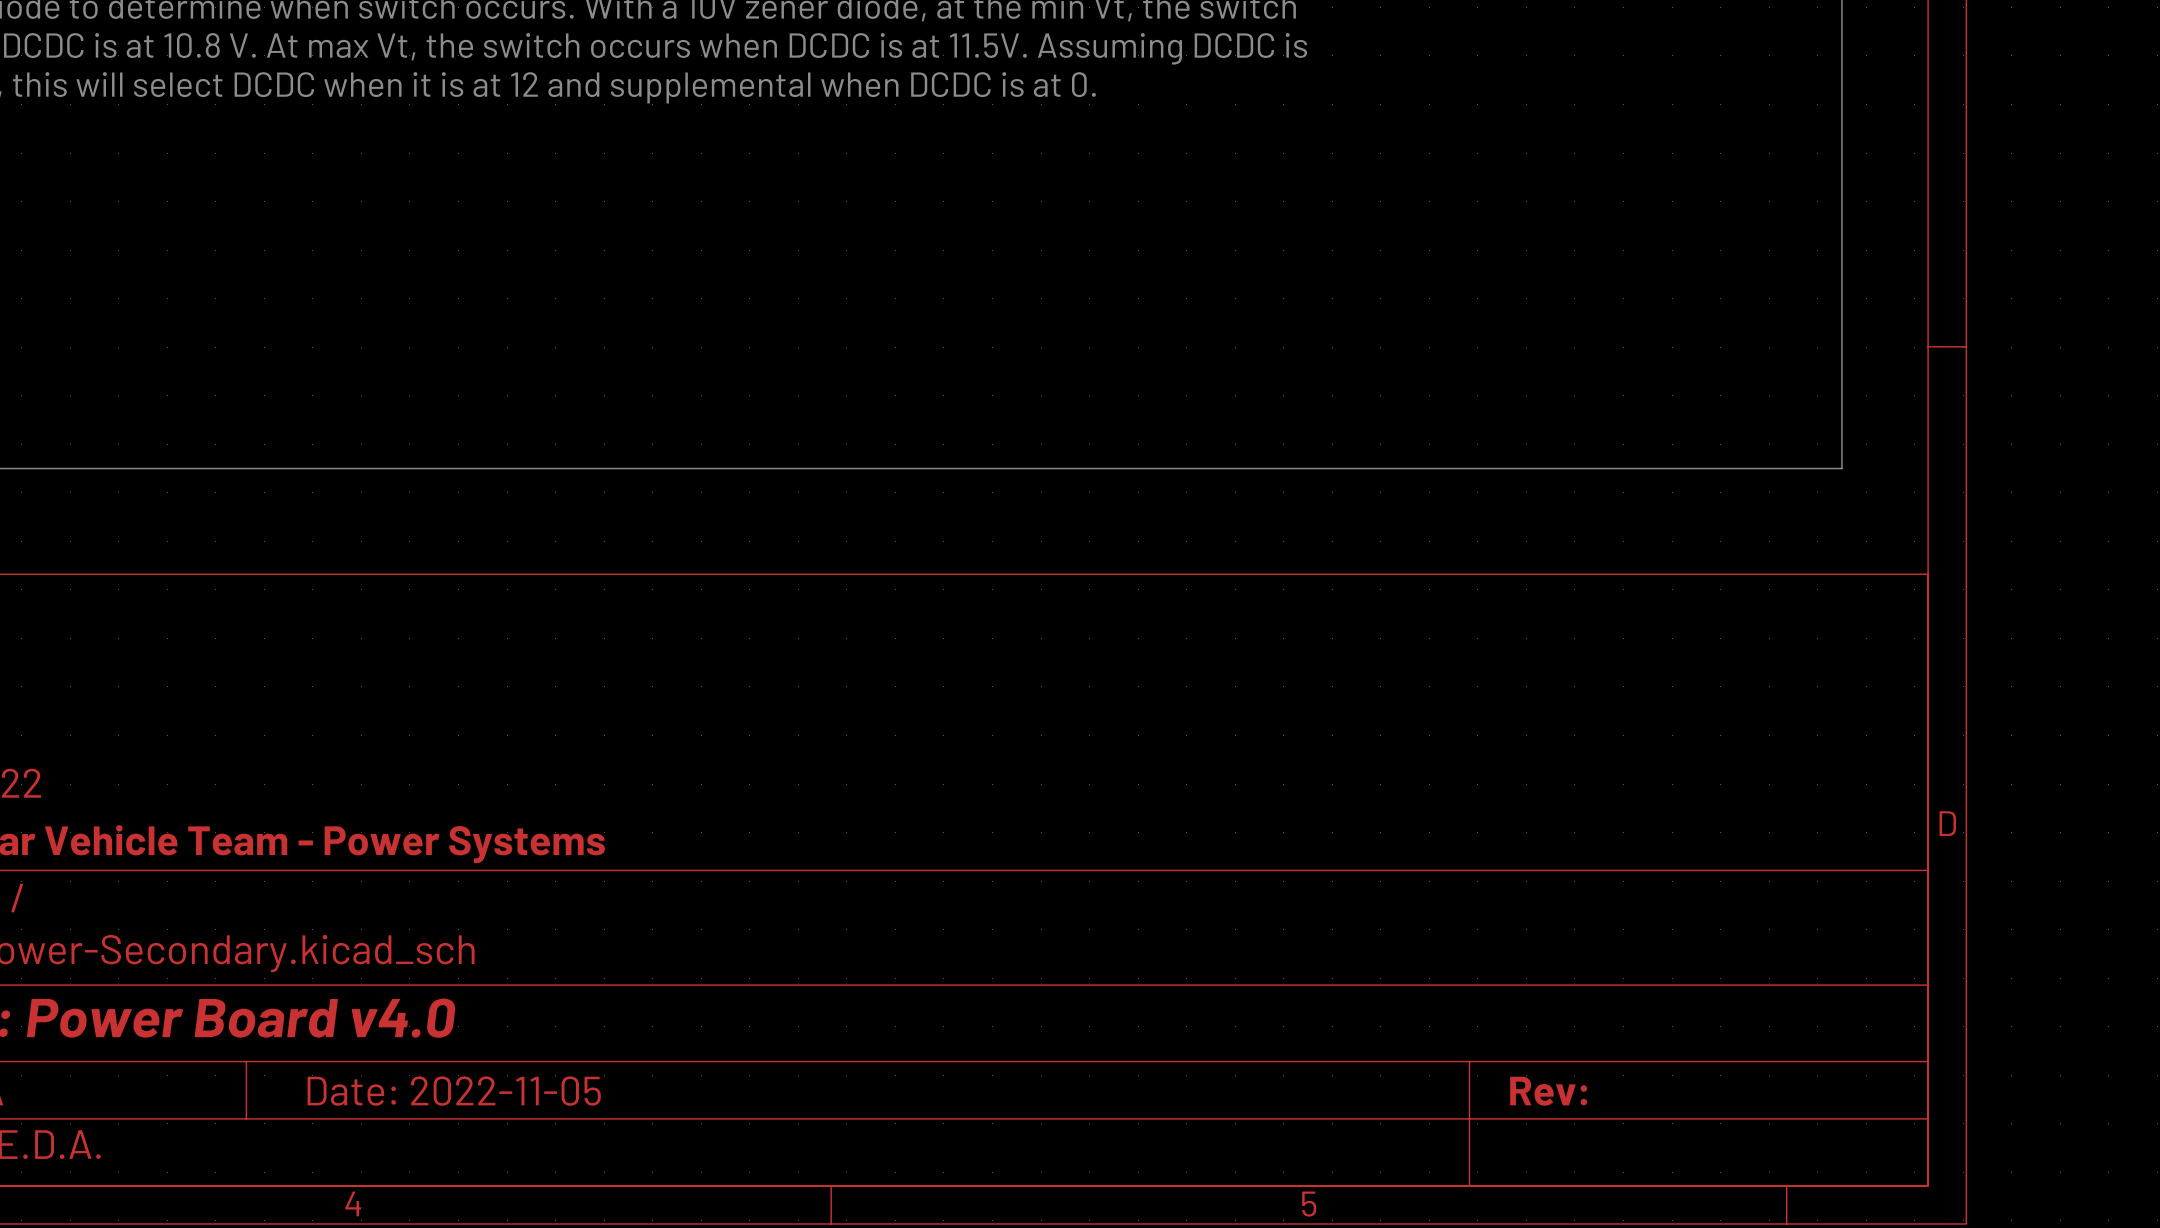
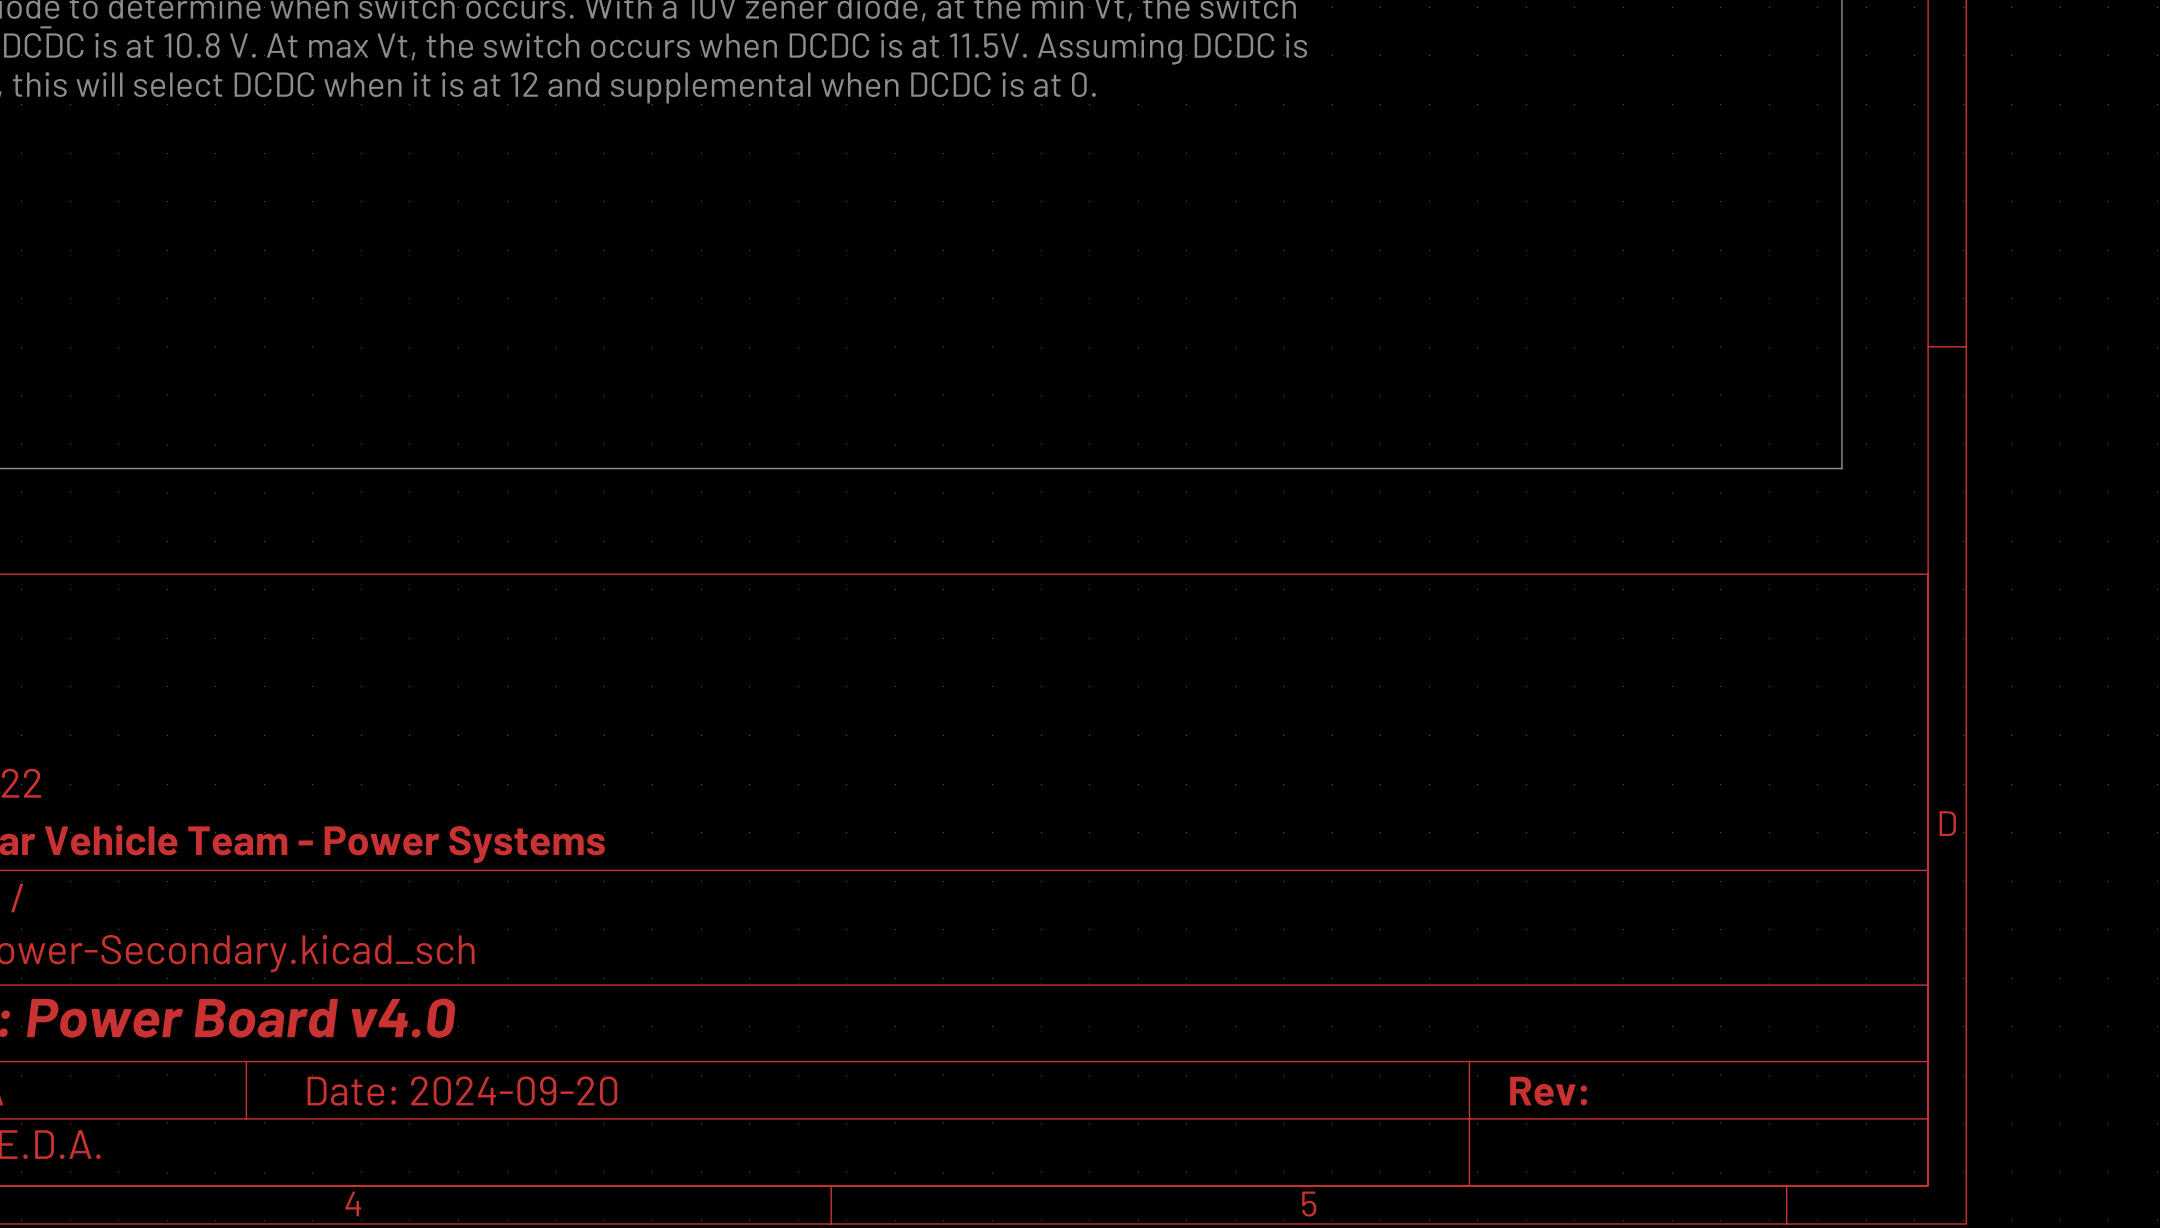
text: none -> - (45, 27)
title block: Date: 2022-11-05 (454, 1091) -> Date: 2024-09-20 (462, 1091)

